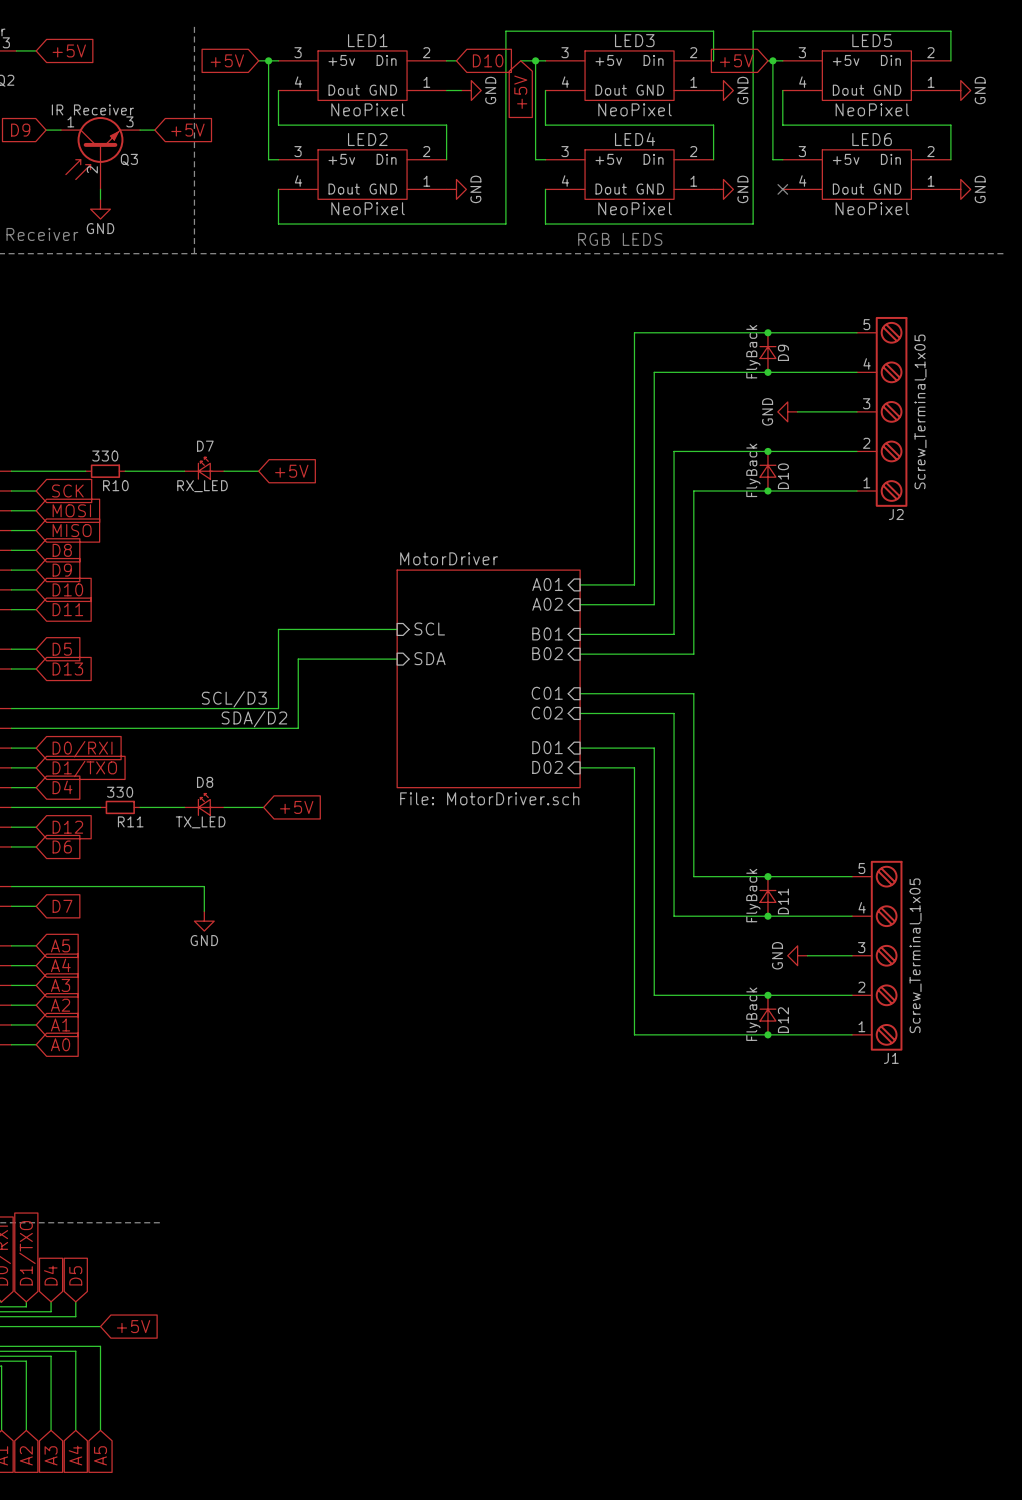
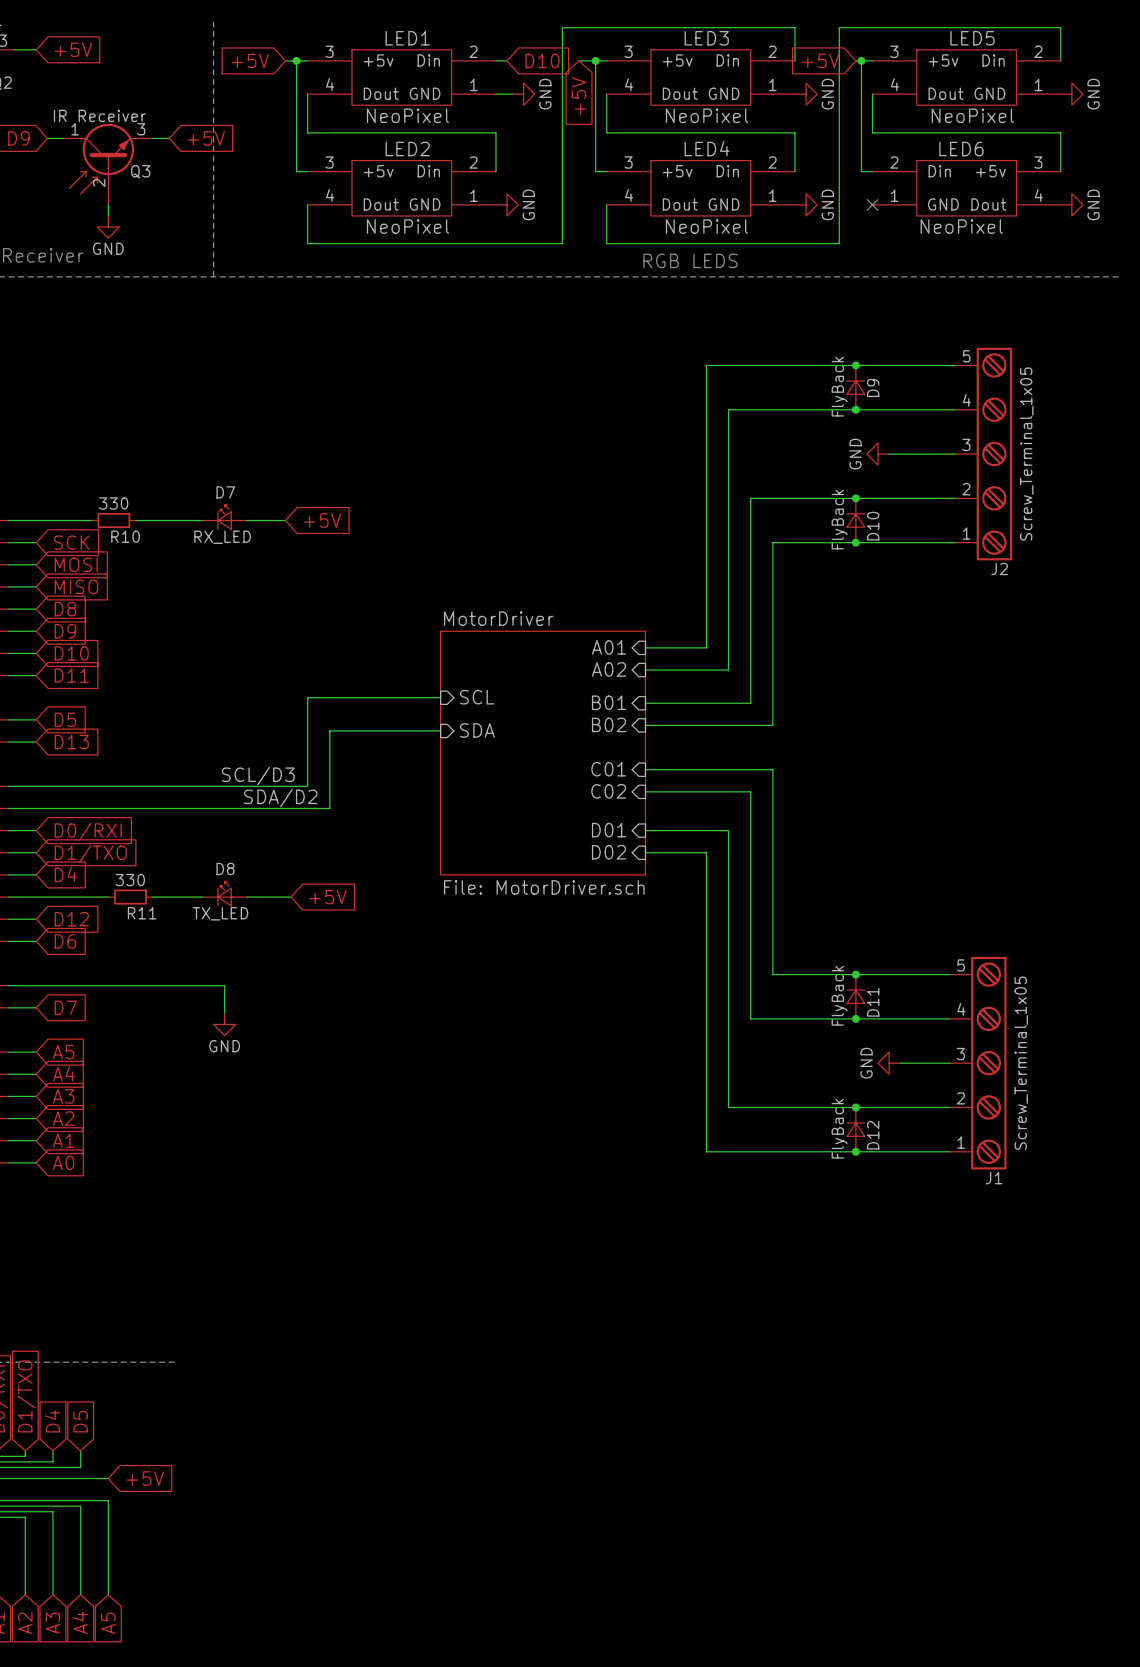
LED6 flip: as is (866, 174) -> left-right (966, 188)

